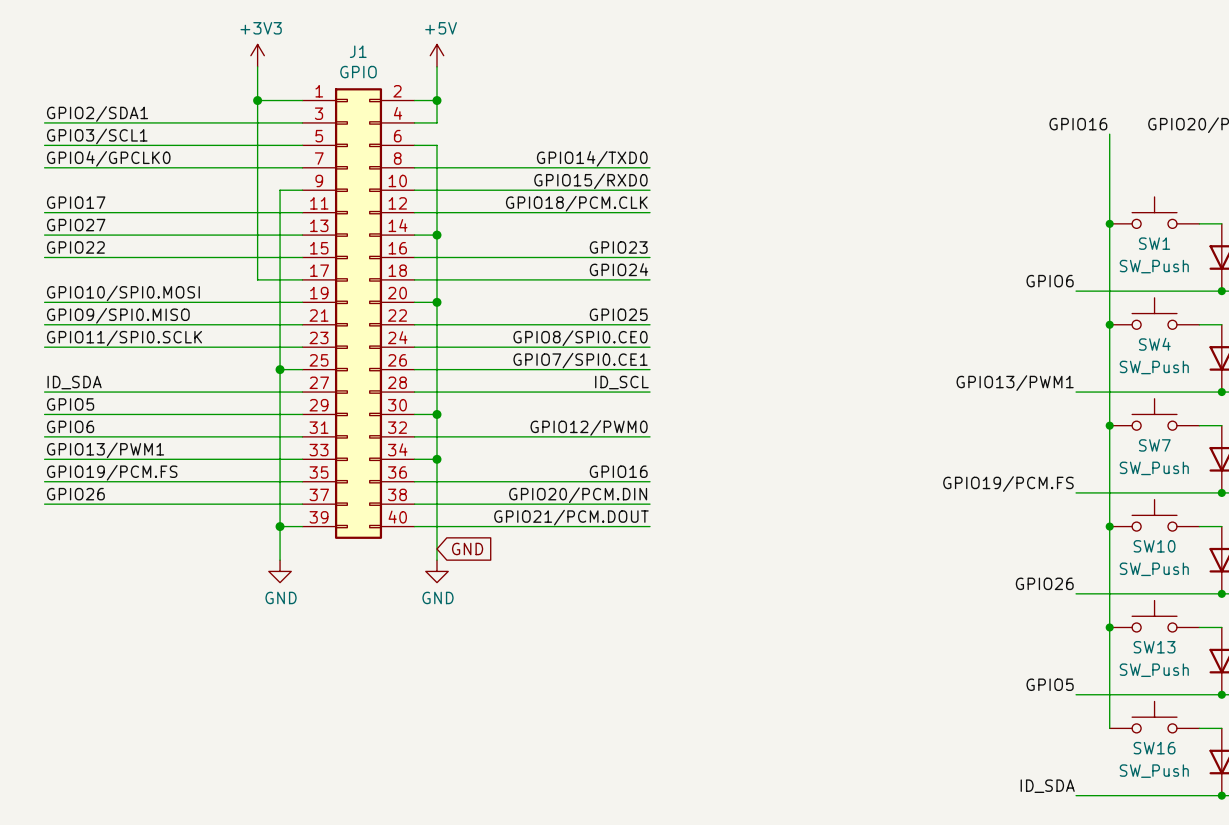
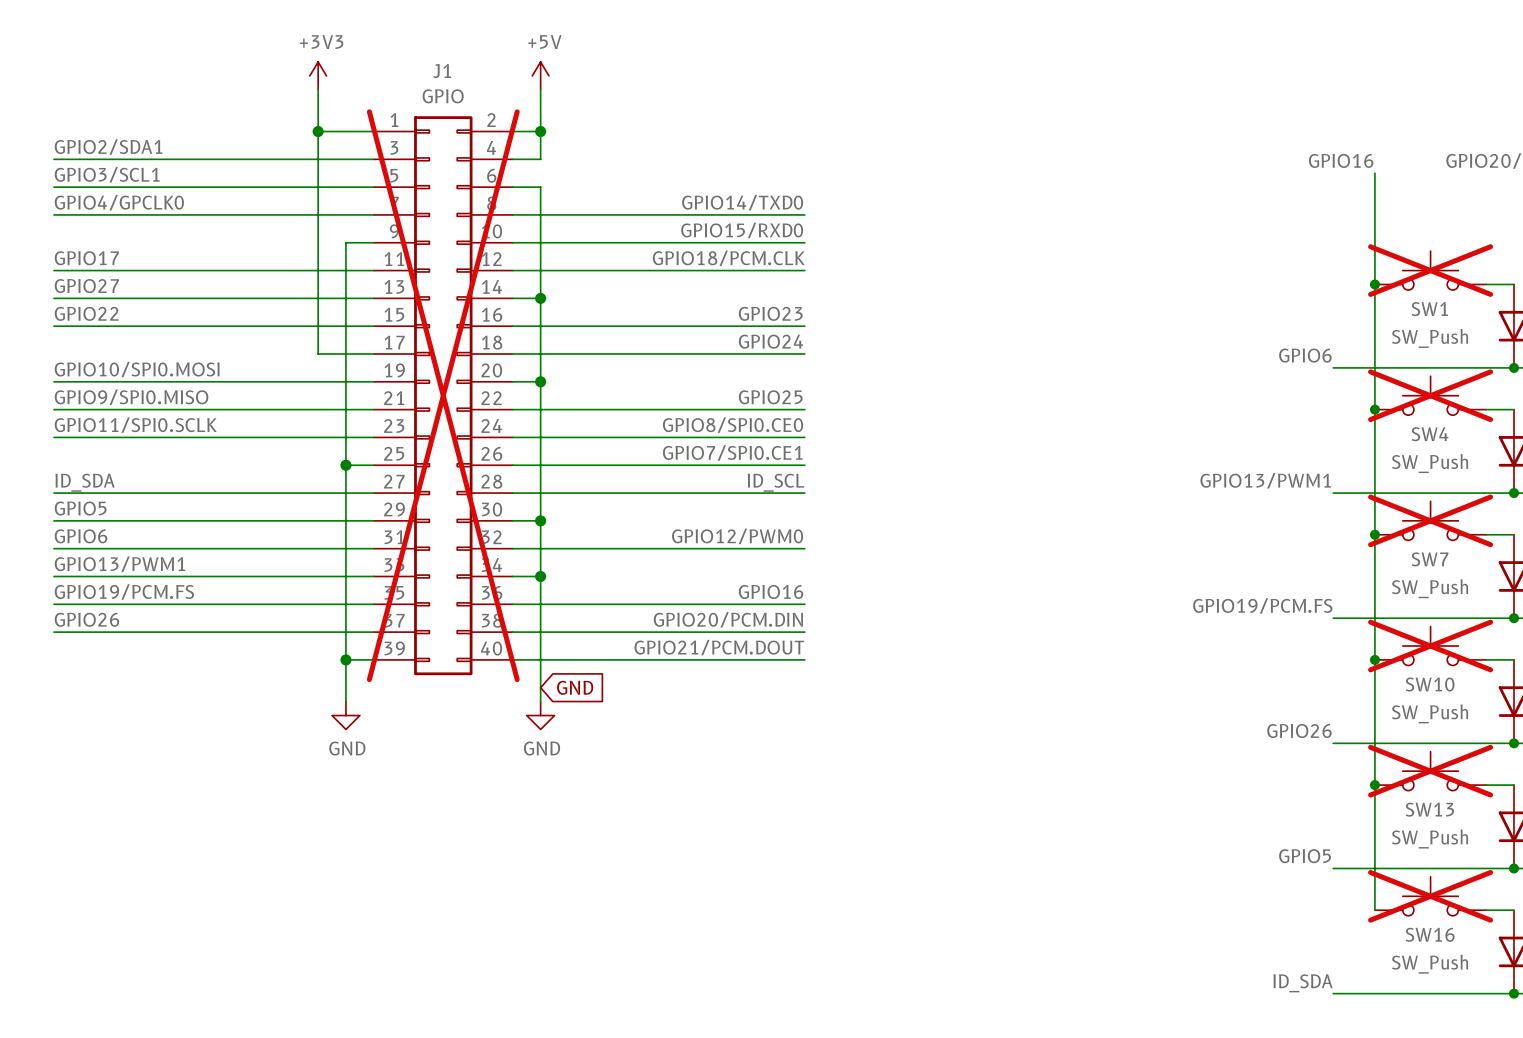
SW1 do-not-place cross: none -> (1430, 270)
J1 do-not-place cross: none -> (443, 395)
SW4 do-not-place cross: none -> (1430, 395)
SW7 do-not-place cross: none -> (1430, 520)
SW10 do-not-place cross: none -> (1430, 646)
SW13 do-not-place cross: none -> (1430, 771)
SW16 do-not-place cross: none -> (1430, 896)

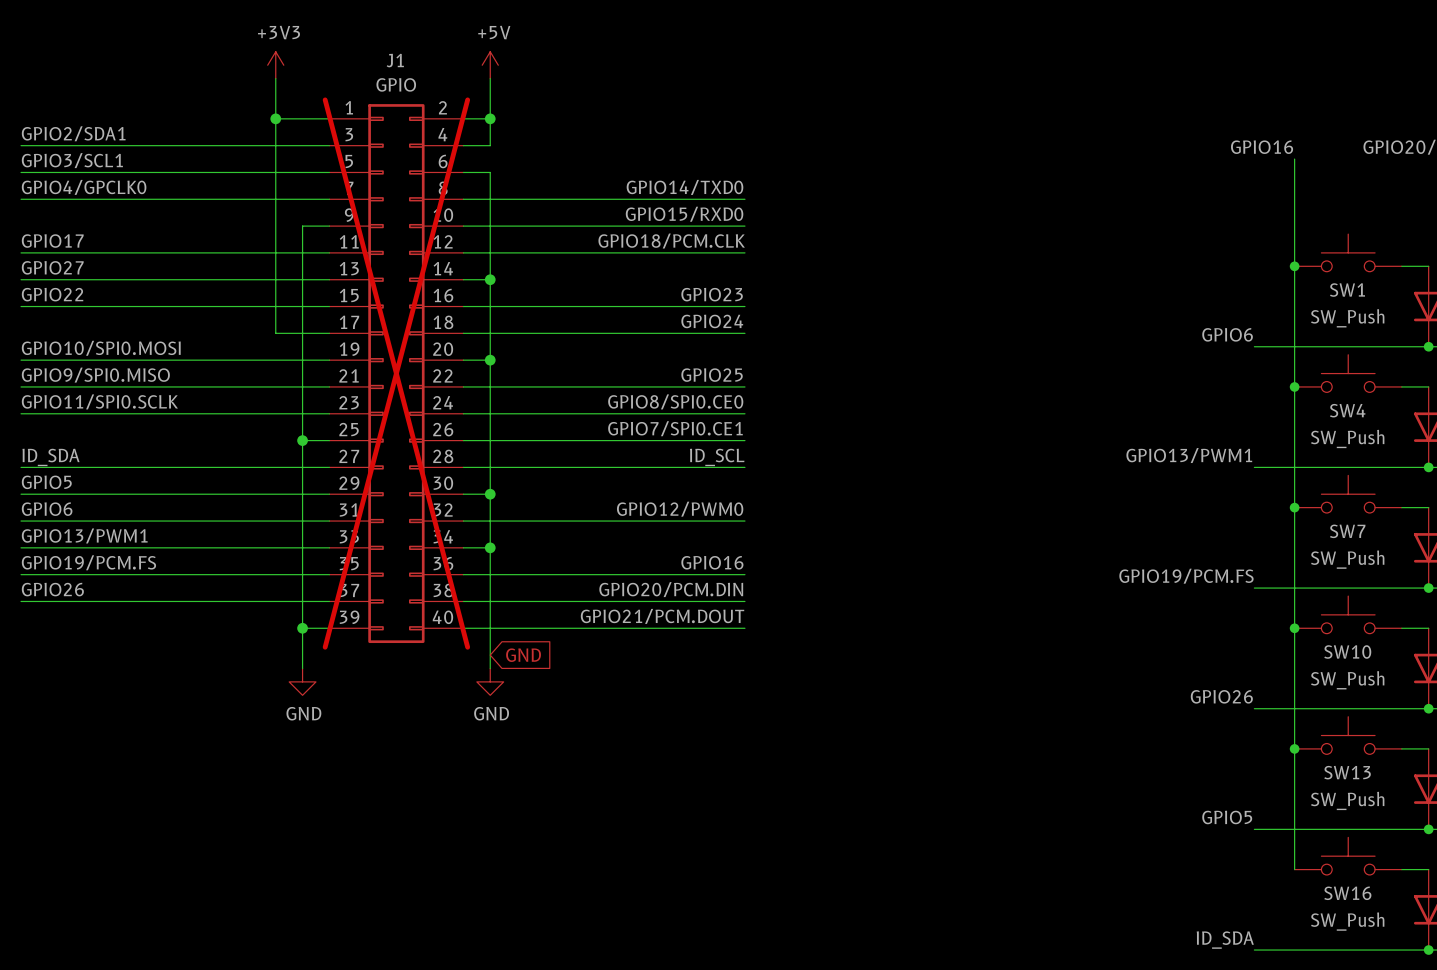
SW1 do-not-place cross: (1430, 270) -> none
SW4 do-not-place cross: (1430, 395) -> none
SW7 do-not-place cross: (1430, 520) -> none
SW10 do-not-place cross: (1430, 646) -> none
SW13 do-not-place cross: (1430, 771) -> none
SW16 do-not-place cross: (1430, 896) -> none

